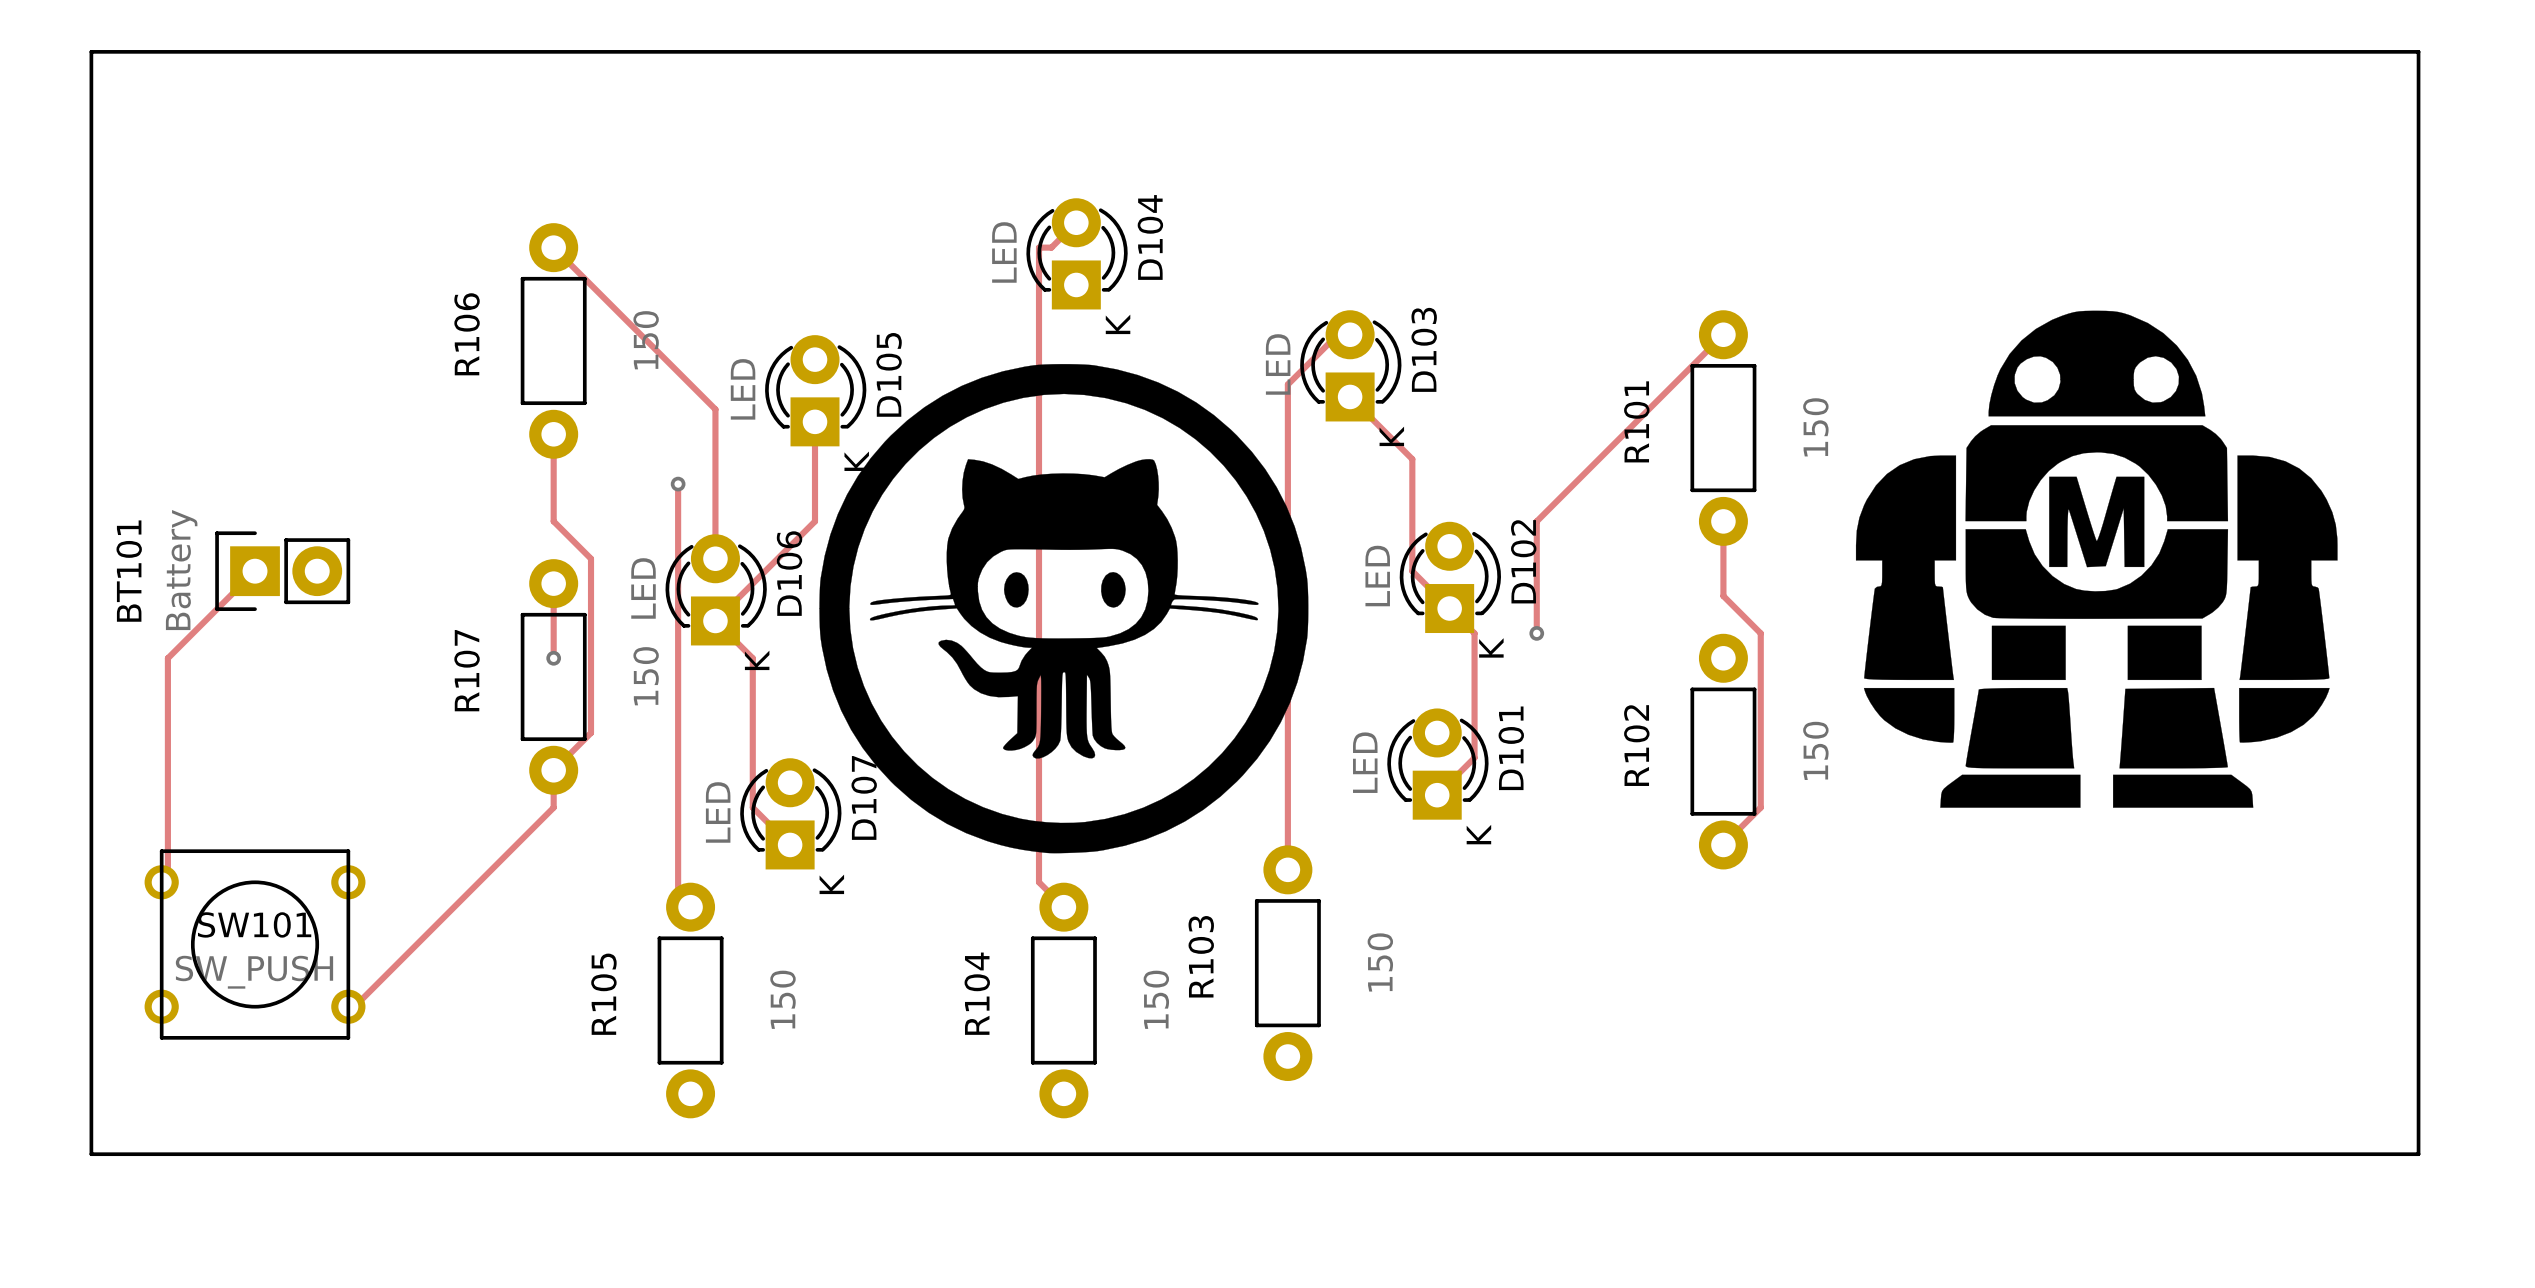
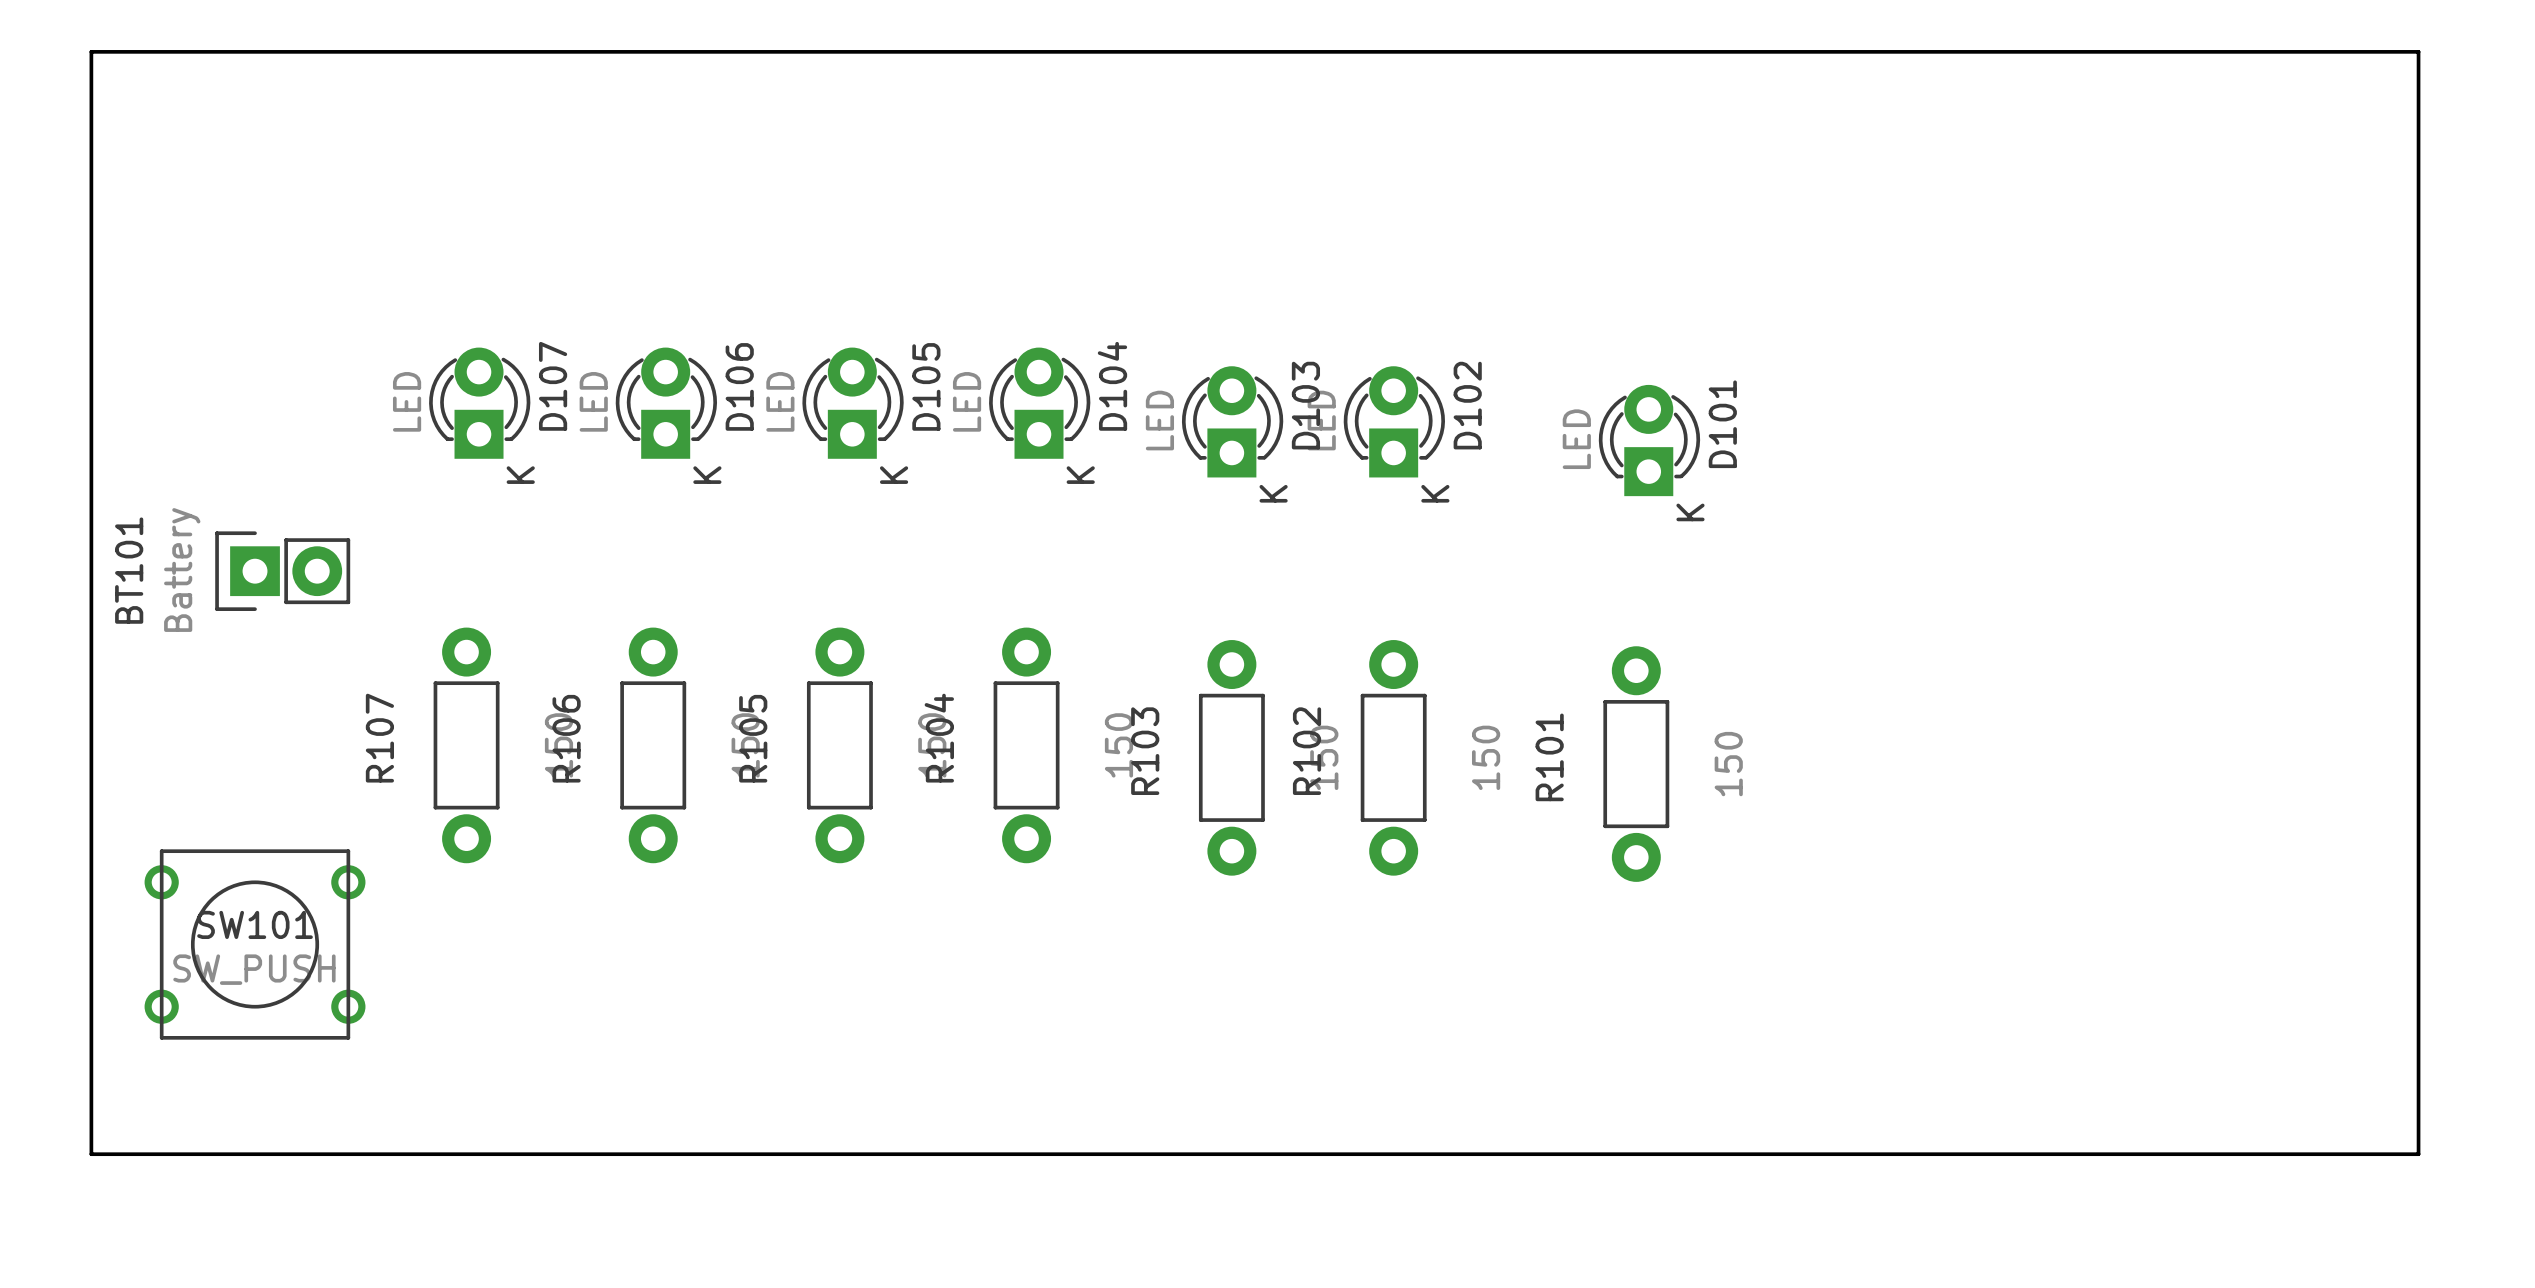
track: (1076, 222) (1051, 247) (1039, 247) (1039, 882) (1063, 907) -> none
track: (553, 247) (715, 409) (715, 558) -> none
D104 position: (1077, 253) -> (1039, 403)
drawing: [1855, 310, 2338, 808] -> none
track: (1350, 334) (1337, 334) (1287, 384) (1287, 869) -> none
track: (1723, 334) (1536, 521) (1536, 633) -> none
R106 position: (553, 340) -> (653, 745)
drawing: [819, 364, 1309, 854] -> none
D103 position: (1350, 365) -> (1232, 421)
D105 position: (815, 390) -> (853, 403)
track: (1350, 396) (1412, 459) (1412, 571) (1474, 633) (1474, 757) (1437, 795) -> none
track: (815, 421) (815, 521) (715, 620) (752, 658) (752, 807) (790, 844) -> none
R101 position: (1723, 428) -> (1636, 764)
track: (553, 434) (553, 521) (591, 558) (591, 732) (553, 770) (553, 807) (354, 1006) (348, 1006) -> none
track: (678, 484) (678, 894) (690, 907) -> none
via: (678, 484) -> none
track: (1723, 521) (1723, 596) (1760, 633) (1760, 807) (1723, 844) -> none
track: (255, 571) (167, 658) (167, 882) (161, 882) -> none
D102 position: (1450, 577) -> (1394, 421)
track: (553, 583) (553, 658) -> none
D106 position: (716, 589) -> (666, 403)
via: (1536, 633) -> none
via: (553, 658) -> none
R107 position: (553, 676) -> (466, 745)
R102 position: (1723, 751) -> (1393, 757)
D101 position: (1437, 764) -> (1649, 440)
D107 position: (790, 813) -> (479, 403)
R103 position: (1287, 963) -> (1231, 757)
R105 position: (690, 1000) -> (839, 745)
R104 position: (1063, 1000) -> (1026, 745)

